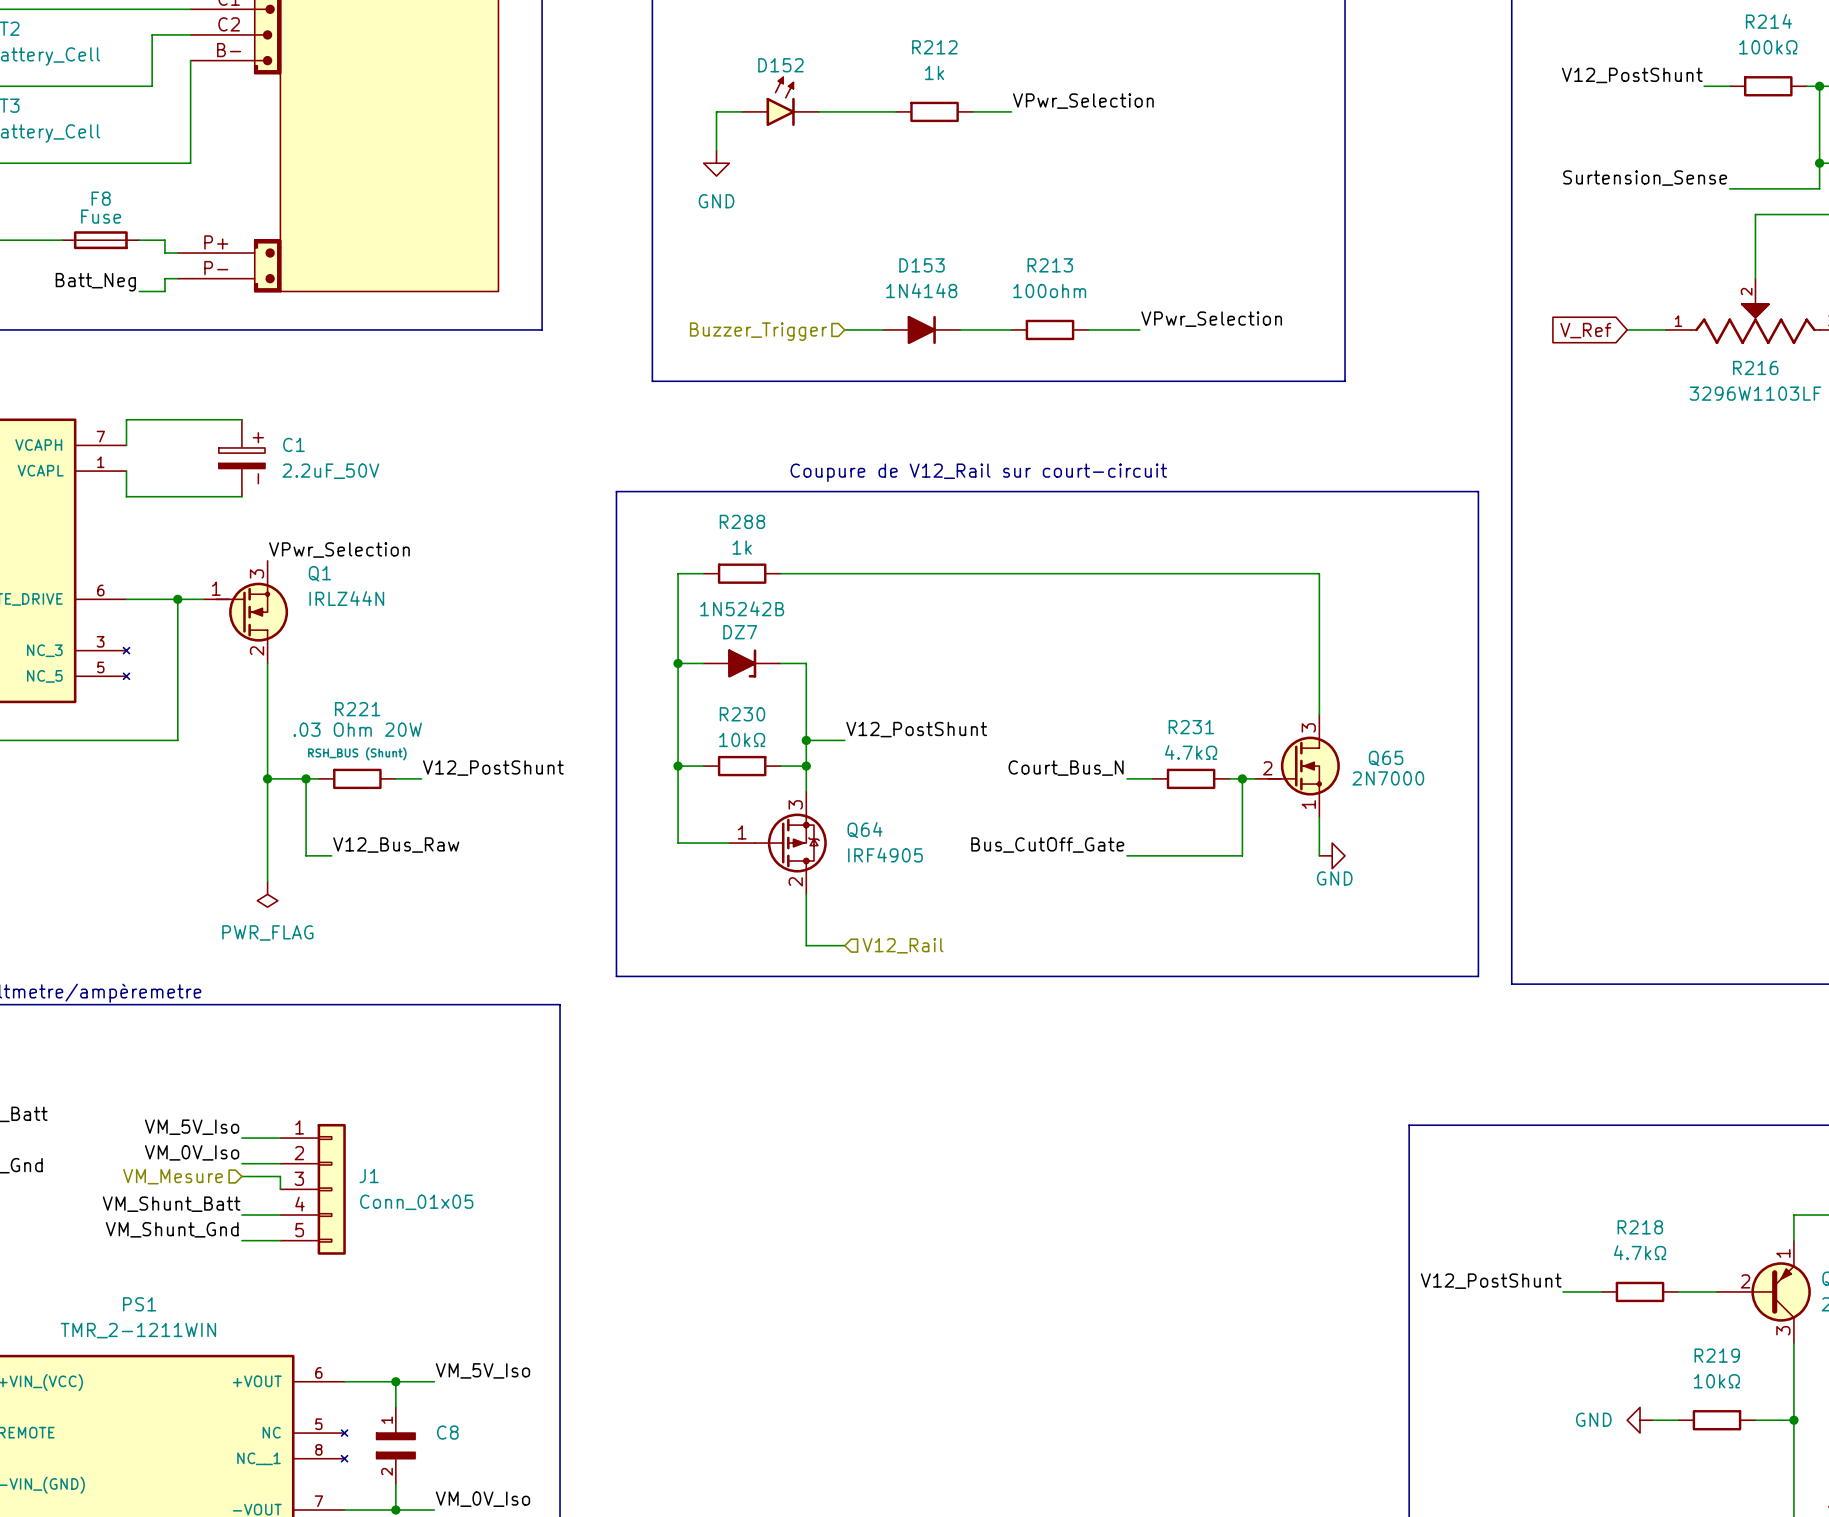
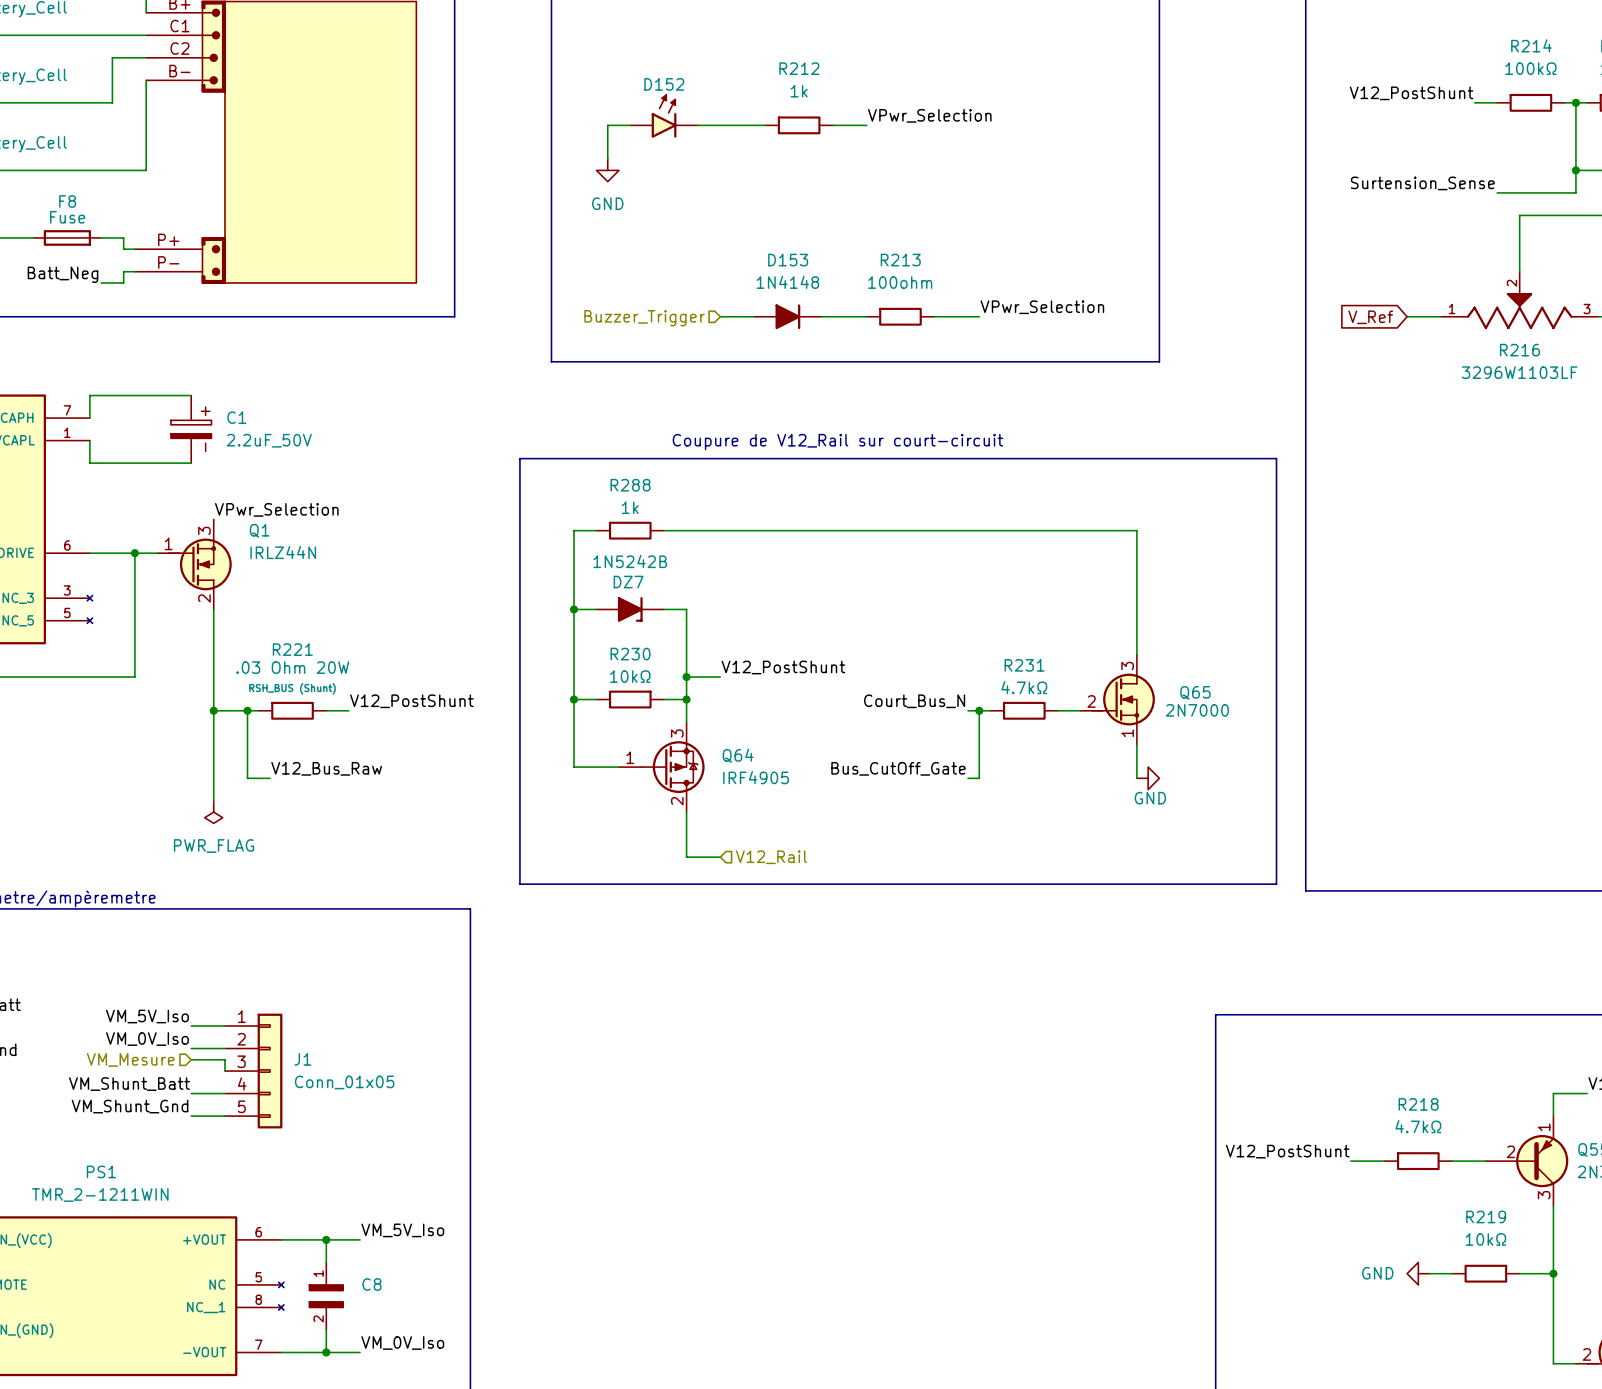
junction: none -> (979, 710)
wire: (1242, 778) (1242, 855) (1139, 855) -> (979, 710) (979, 778)
junction: (1242, 778) -> none

